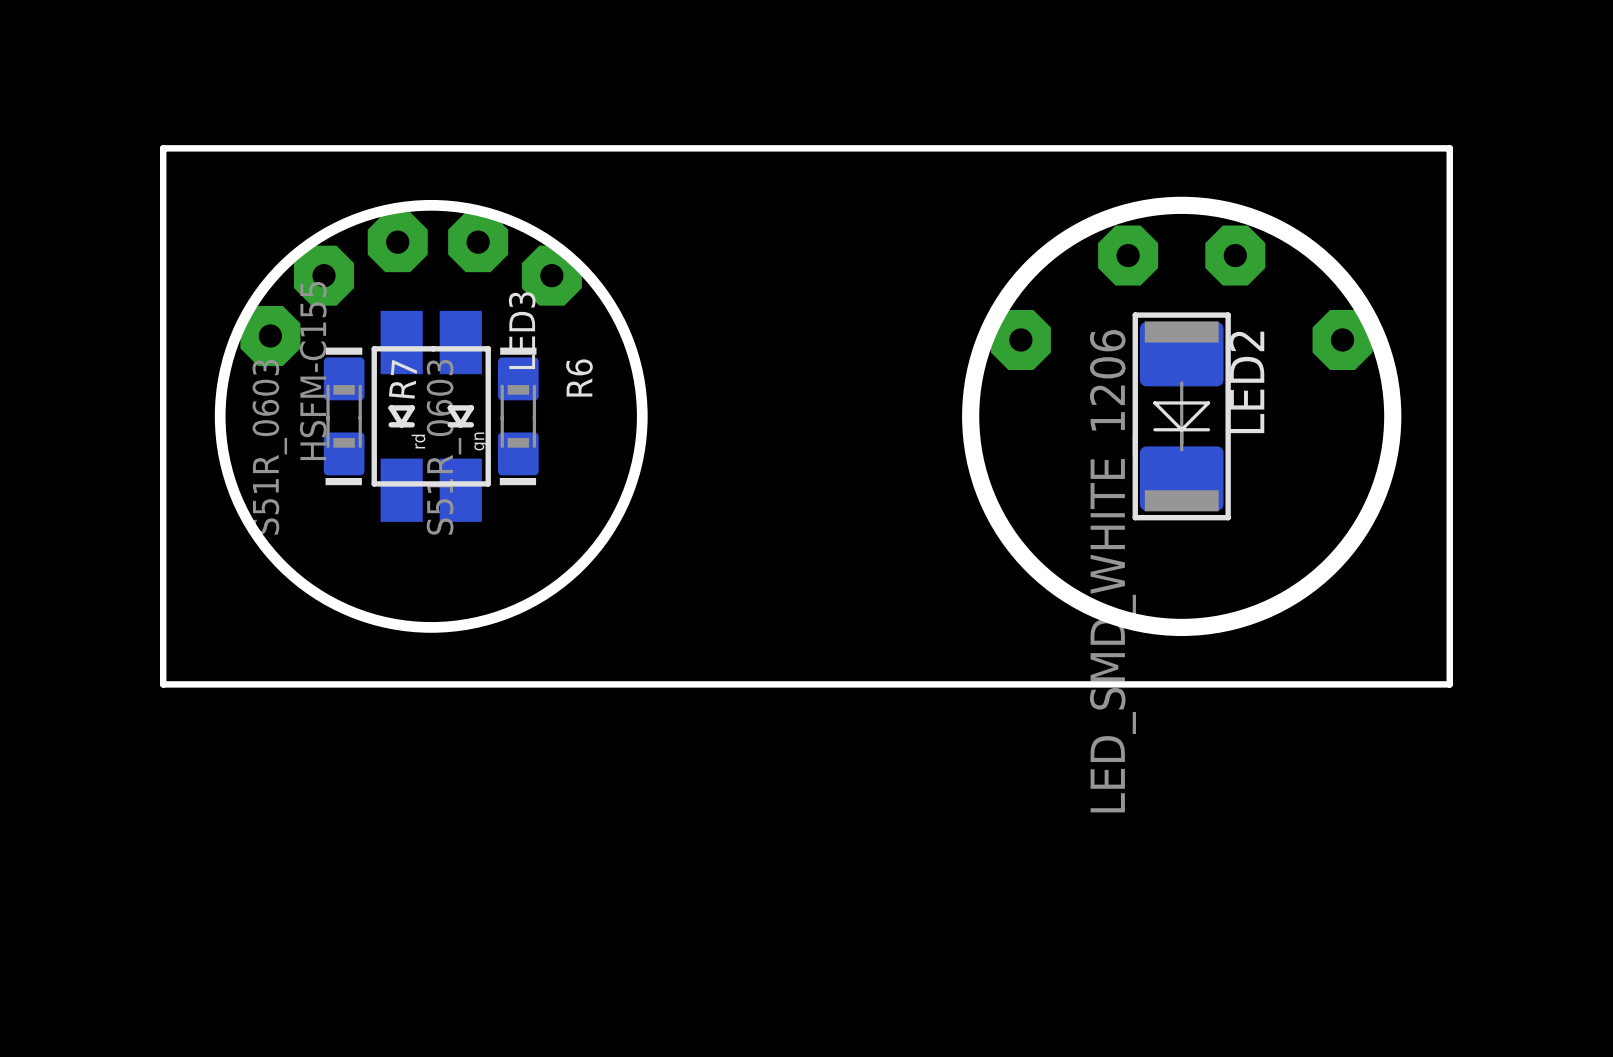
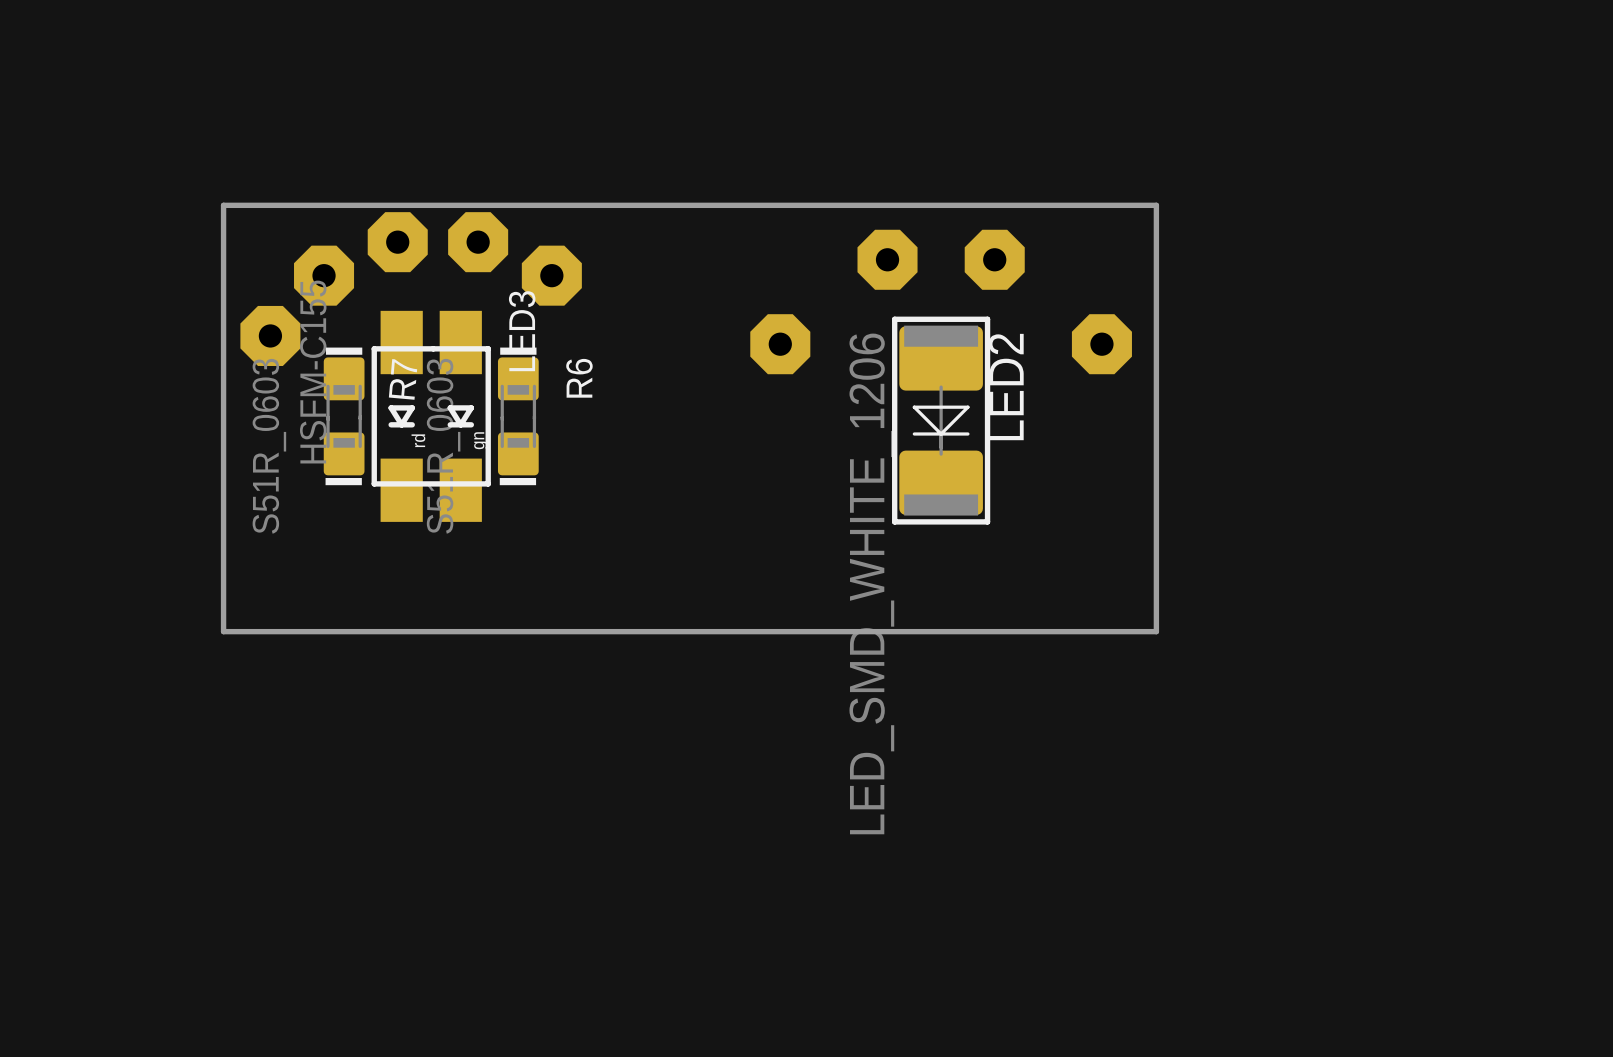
board edge: (1449, 148) (1449, 684) (163, 684) (163, 148) (1449, 148) -> (1156, 205) (1156, 631) (223, 631) (223, 205) (1156, 205)
round board edge: [962, 196, 1402, 637] -> none
round board edge: [214, 199, 648, 633] -> none
part: (1128, 255) -> none
part: (1235, 255) -> none
part: none -> (887, 259)
part: none -> (994, 259)
part: (1020, 339) -> none
part: (1342, 339) -> none
part: none -> (780, 344)
part: none -> (1101, 344)
LED2 position: (1181, 416) -> (941, 420)

